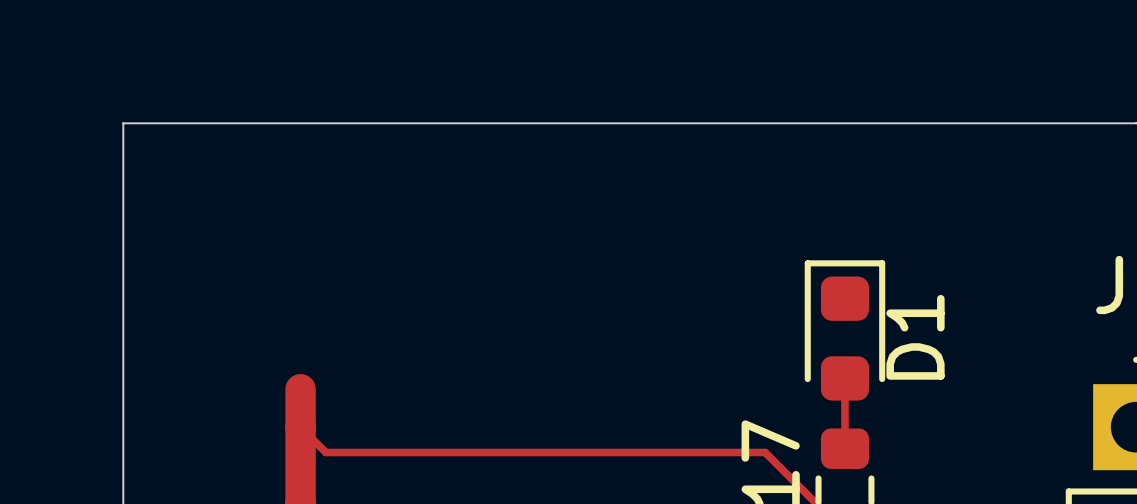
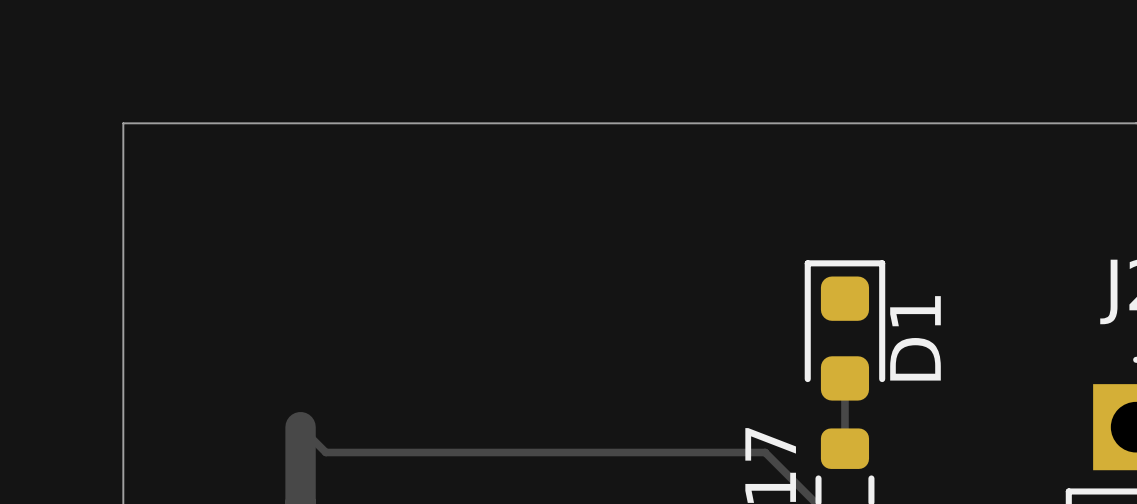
track: (300, 389) (300, 427) -> none

